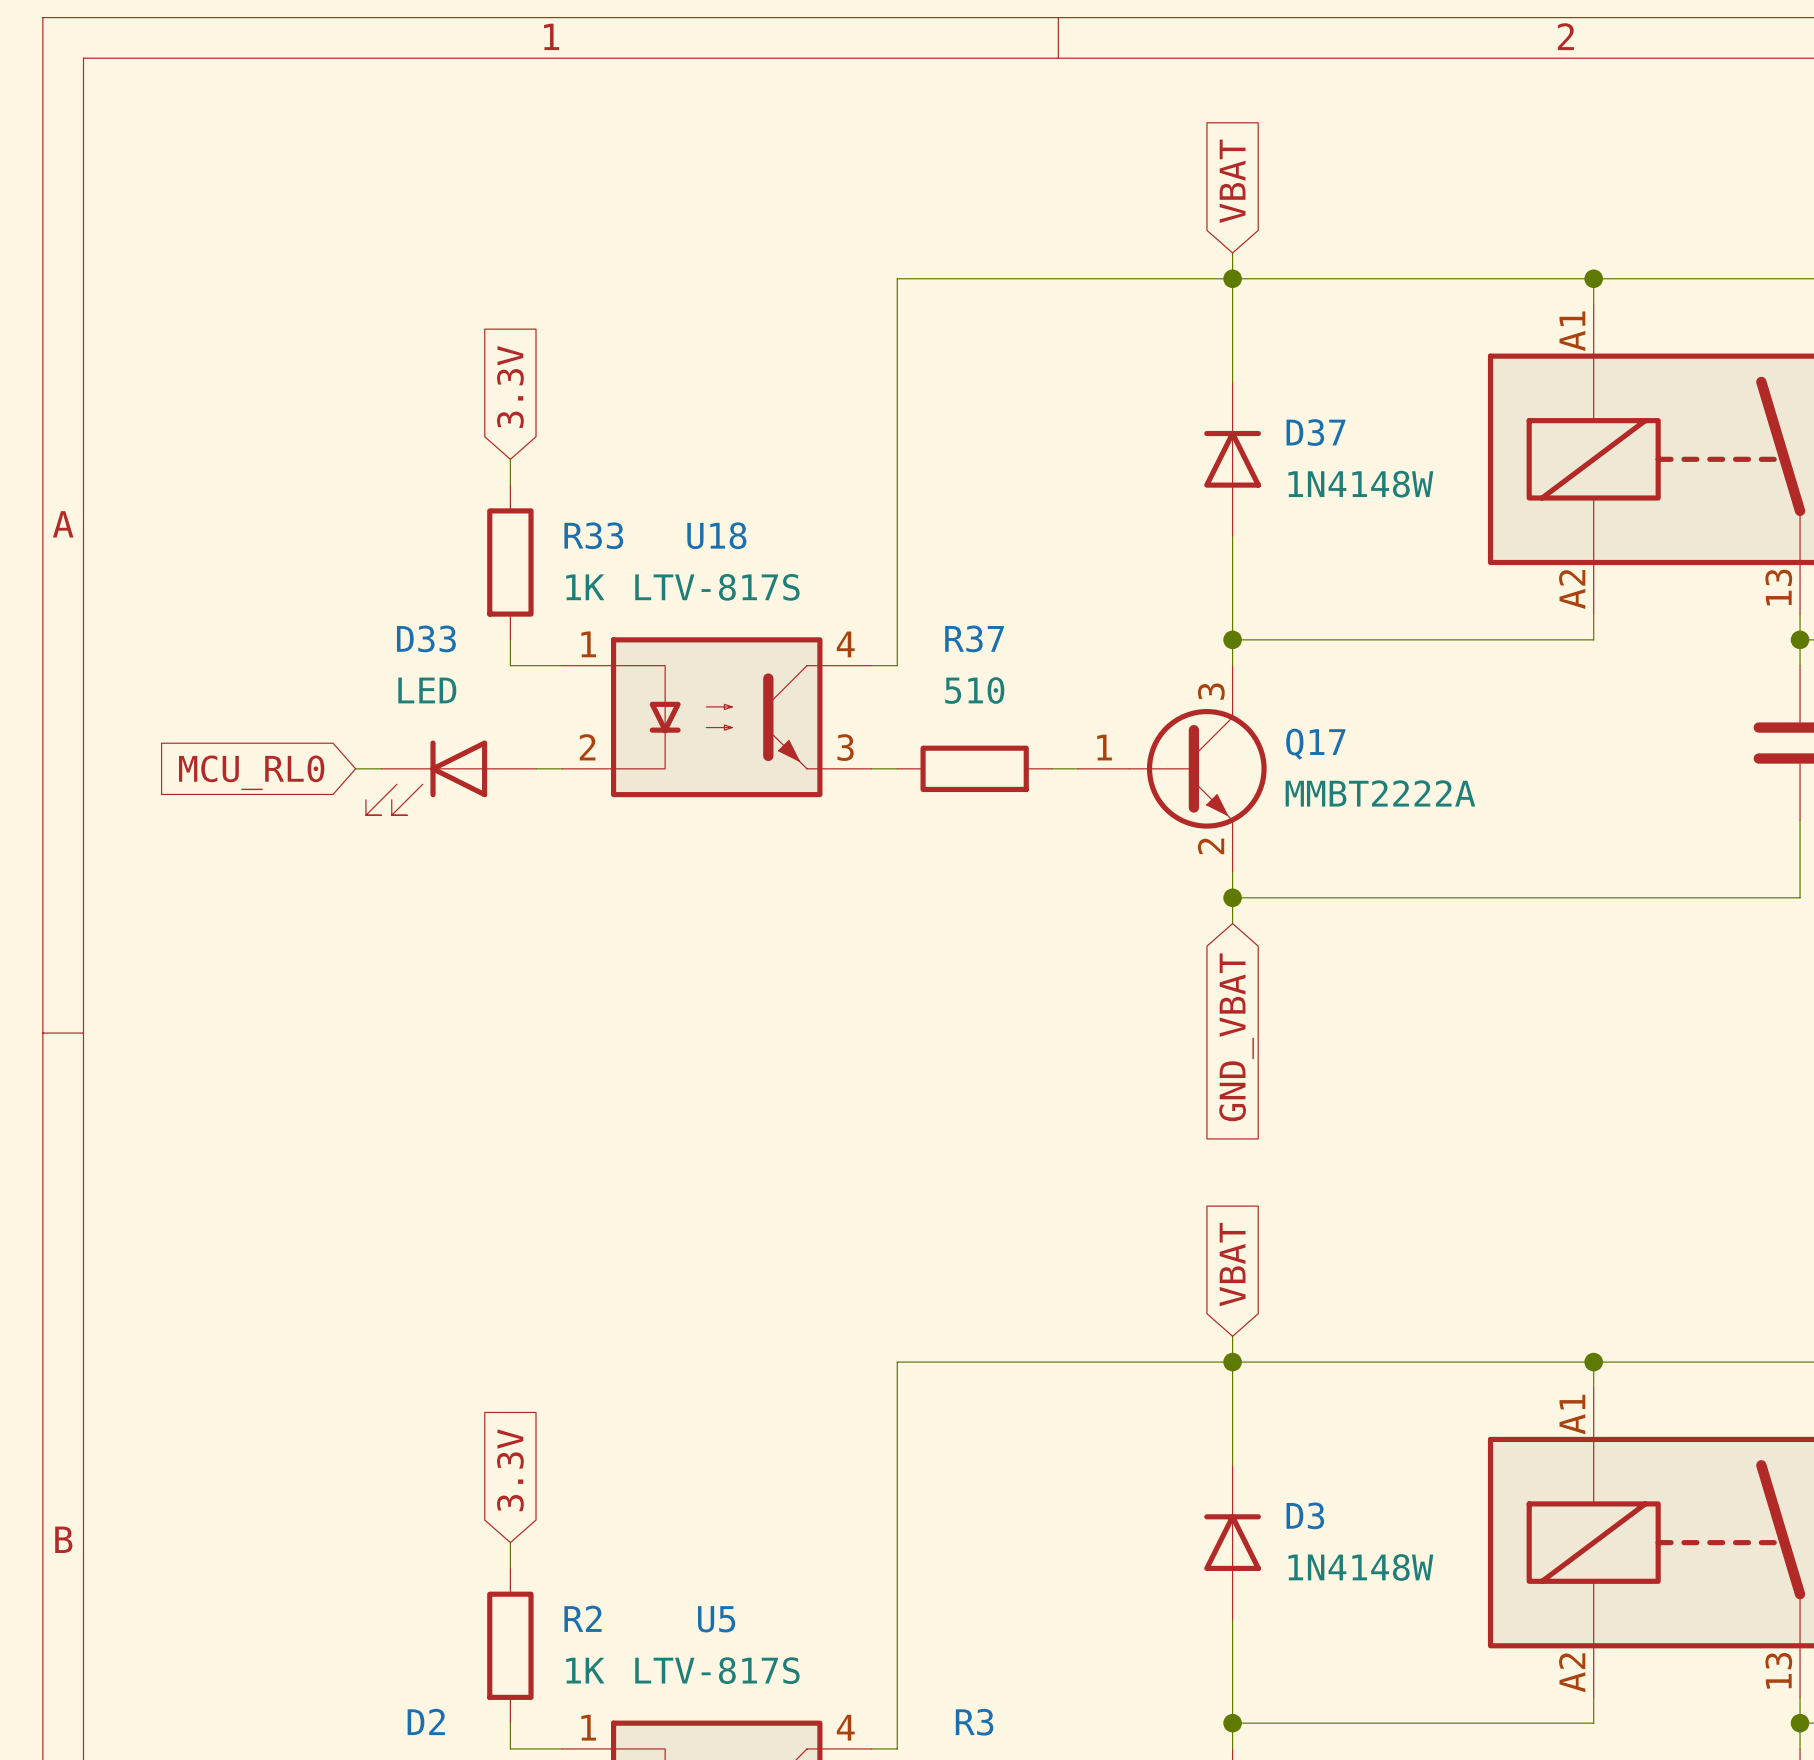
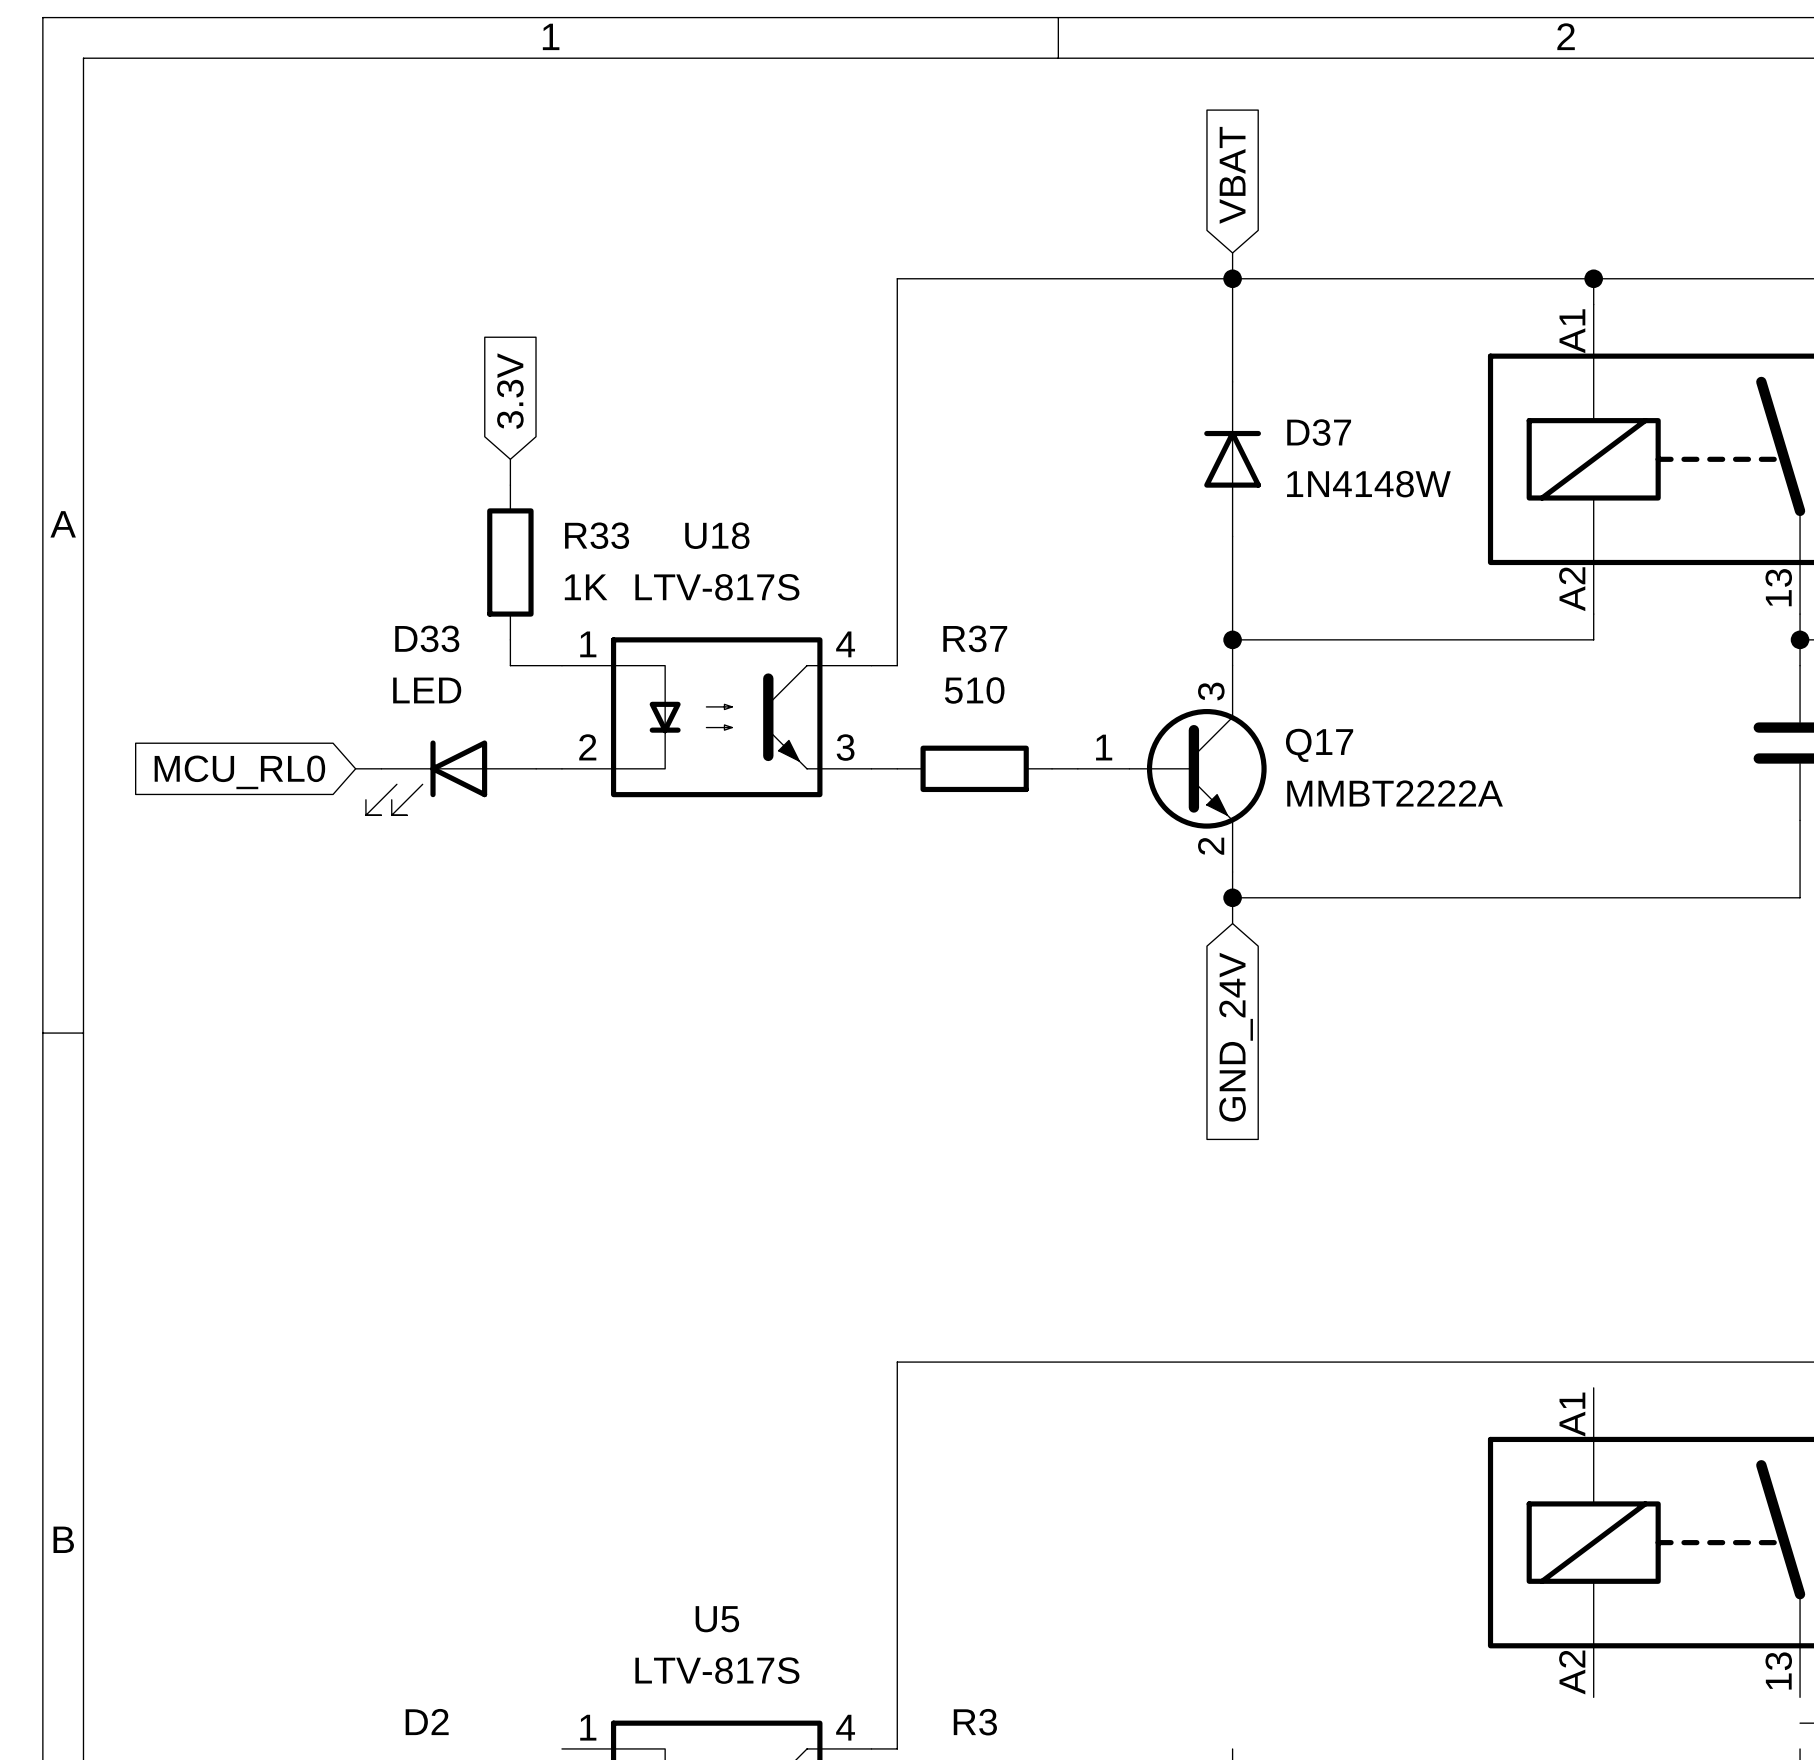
global label: GND_VBAT (1236, 1037) -> GND_24V (1236, 1037)
global label: VBAT (1232, 1264) -> none
wire: (1232, 1336) (1232, 1465) -> none
junction: (1232, 1362) -> none
wire: (1593, 1362) (1593, 1387) -> none
junction: (1593, 1362) -> none
global label: 3.3V (510, 1470) -> none
wire: (510, 1542) (510, 1568) -> none
D3: 1N4148W (1232, 1542) -> none
wire: (1232, 1619) (1232, 1748) -> none
R2: 1K (510, 1645) -> none
wire: (1593, 1697) (1593, 1723) (1232, 1723) -> none
wire: (1800, 1697) (1800, 1748) -> none
wire: (510, 1723) (510, 1748) (561, 1748) -> none
junction: (1232, 1723) -> none
junction: (1800, 1723) -> none

